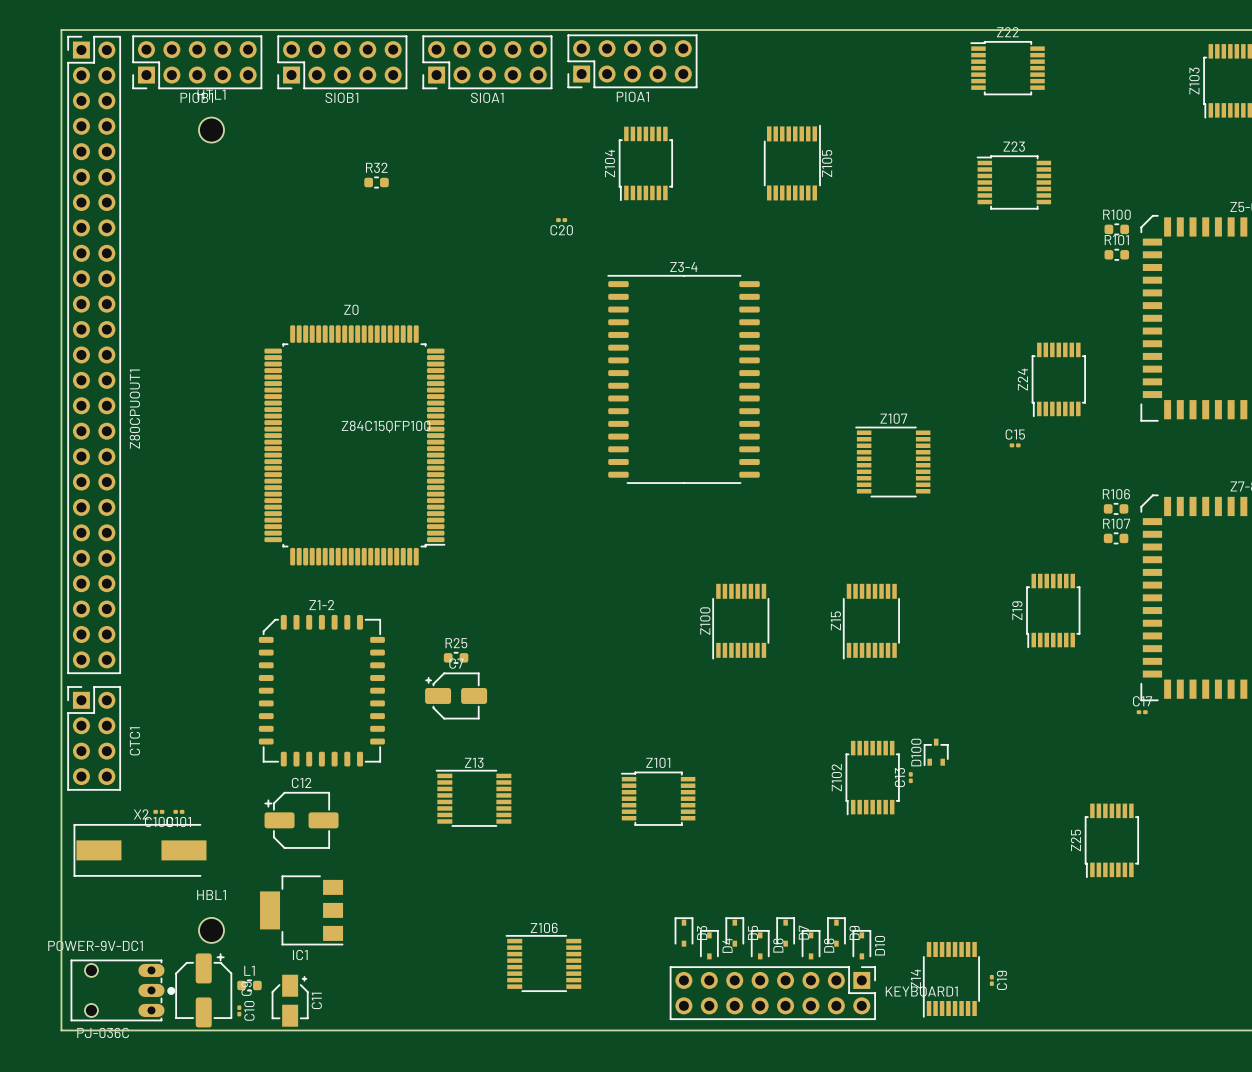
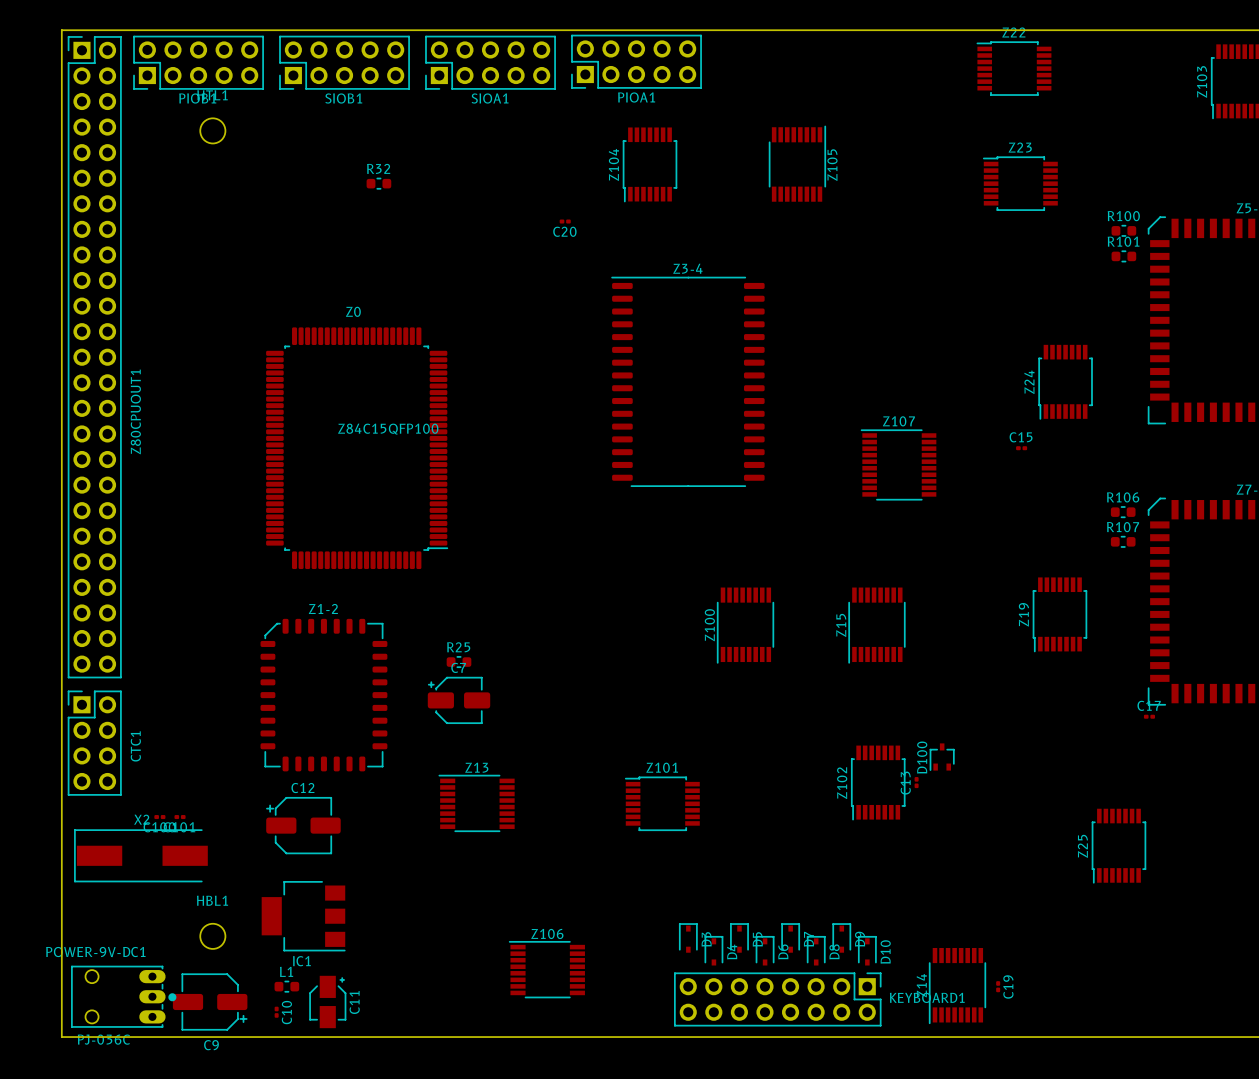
L1 position: (249, 985) -> (286, 986)
C9 rotation: 0° (203, 990) -> 90° clockwise (210, 1001)
C11 position: (290, 1000) -> (327, 1001)
C10 position: (239, 1010) -> (276, 1012)

